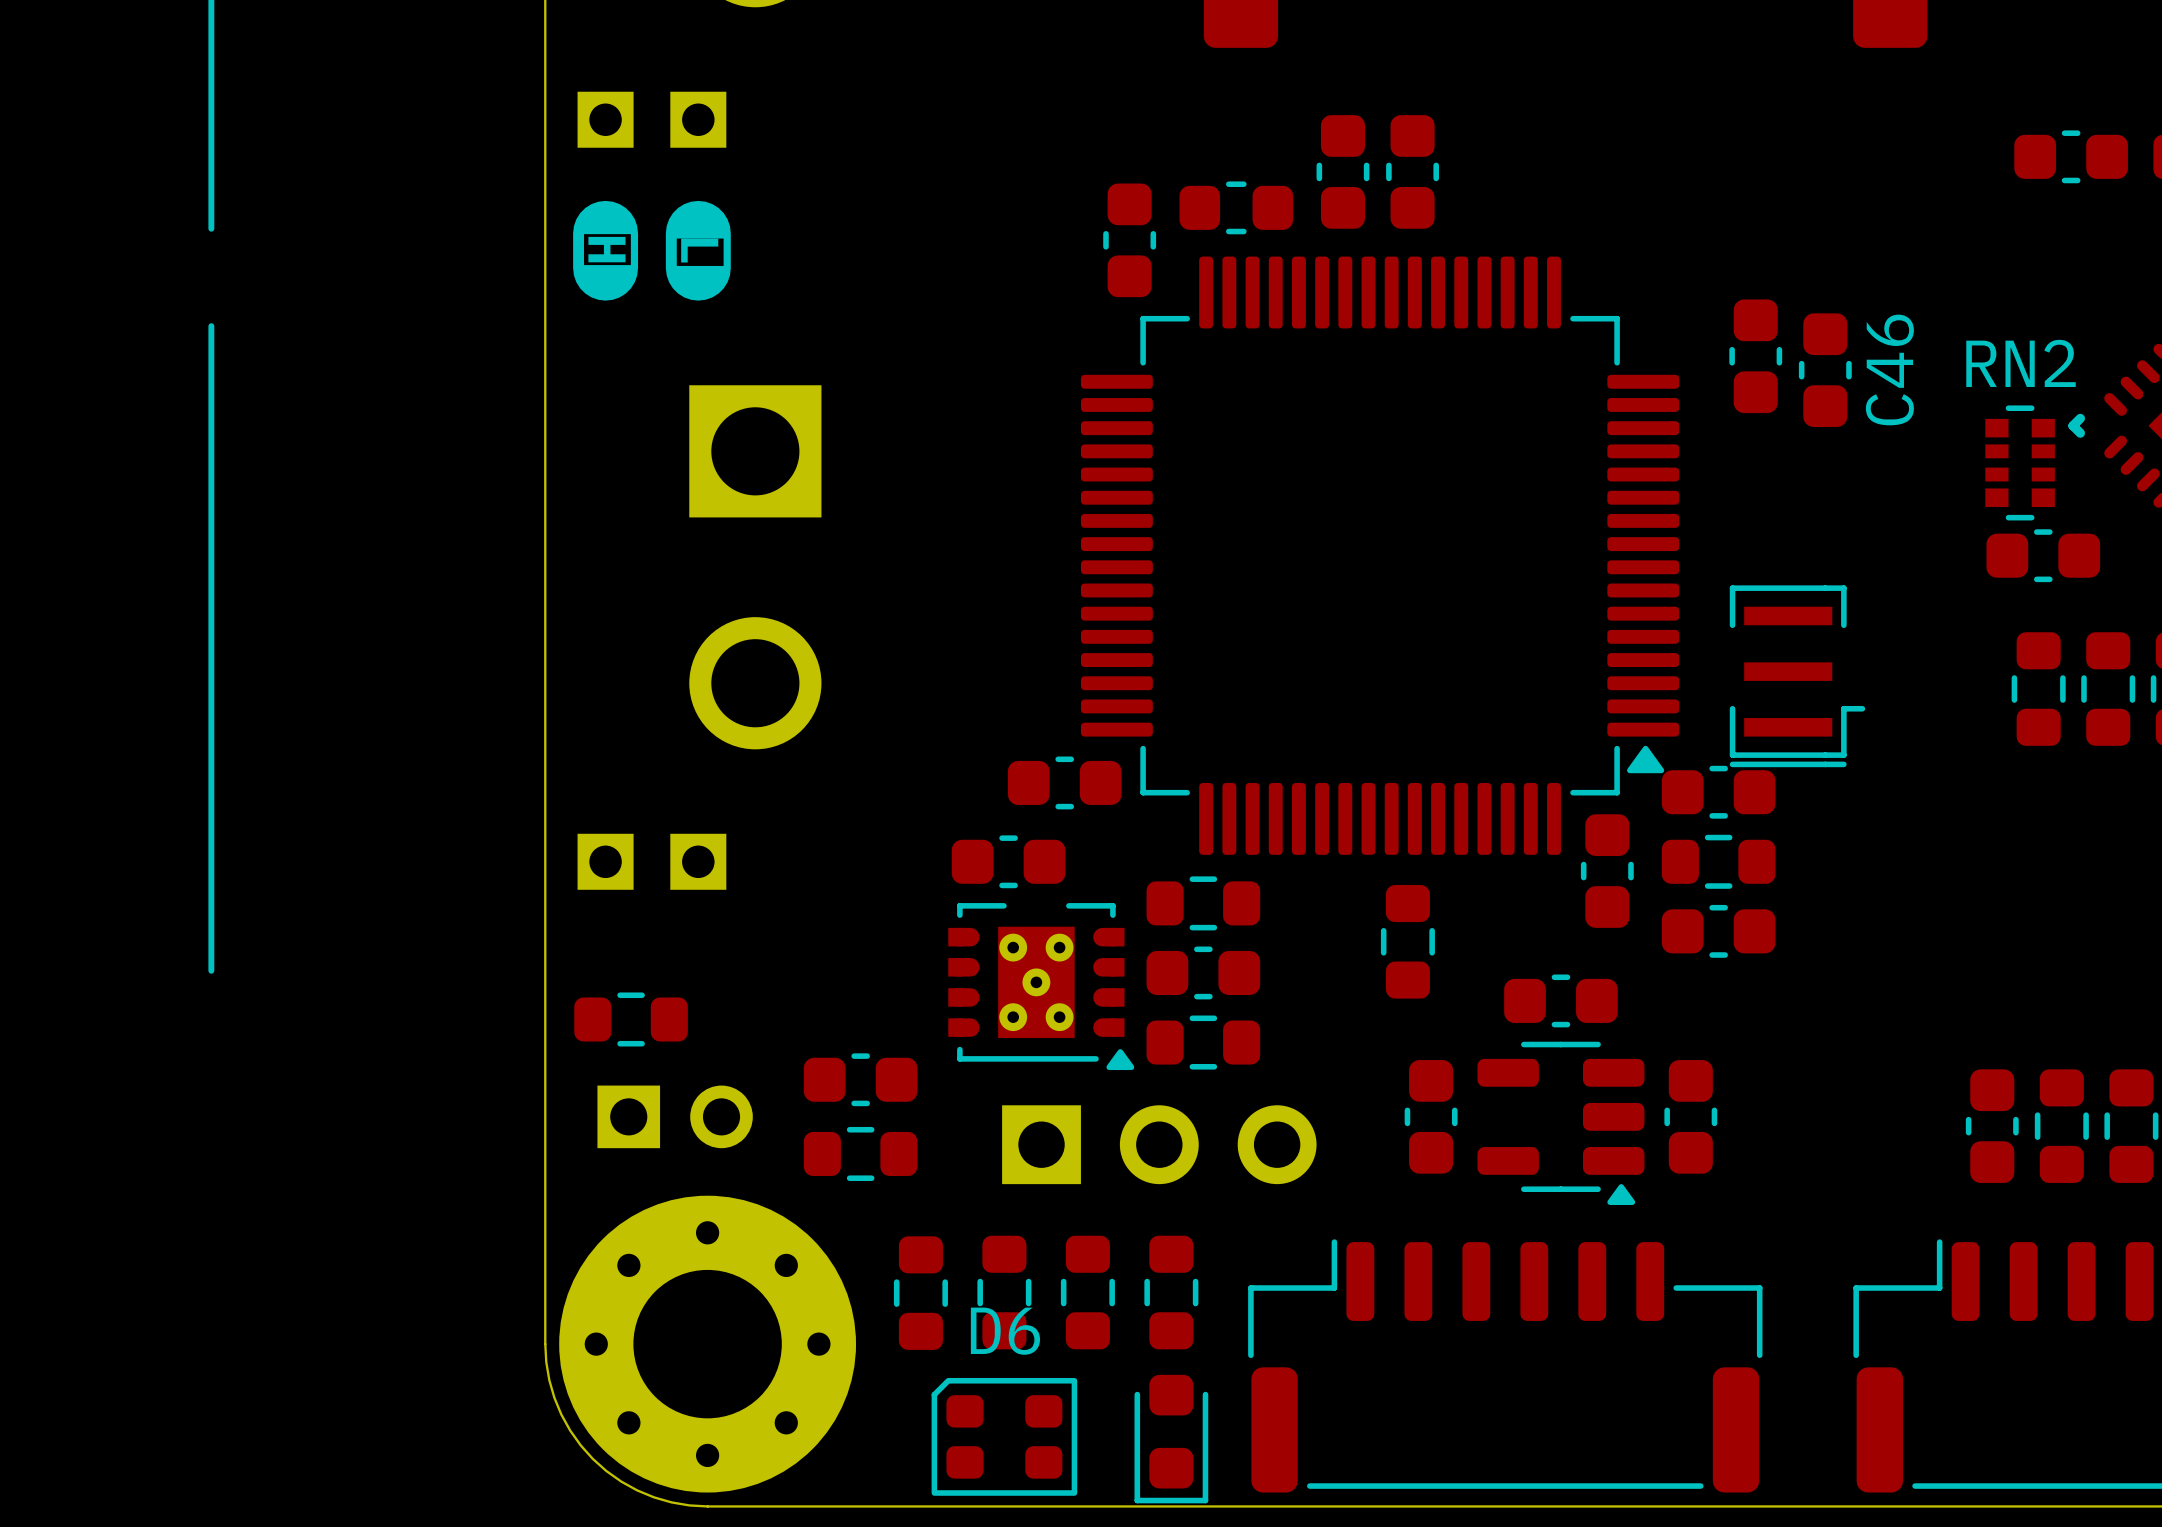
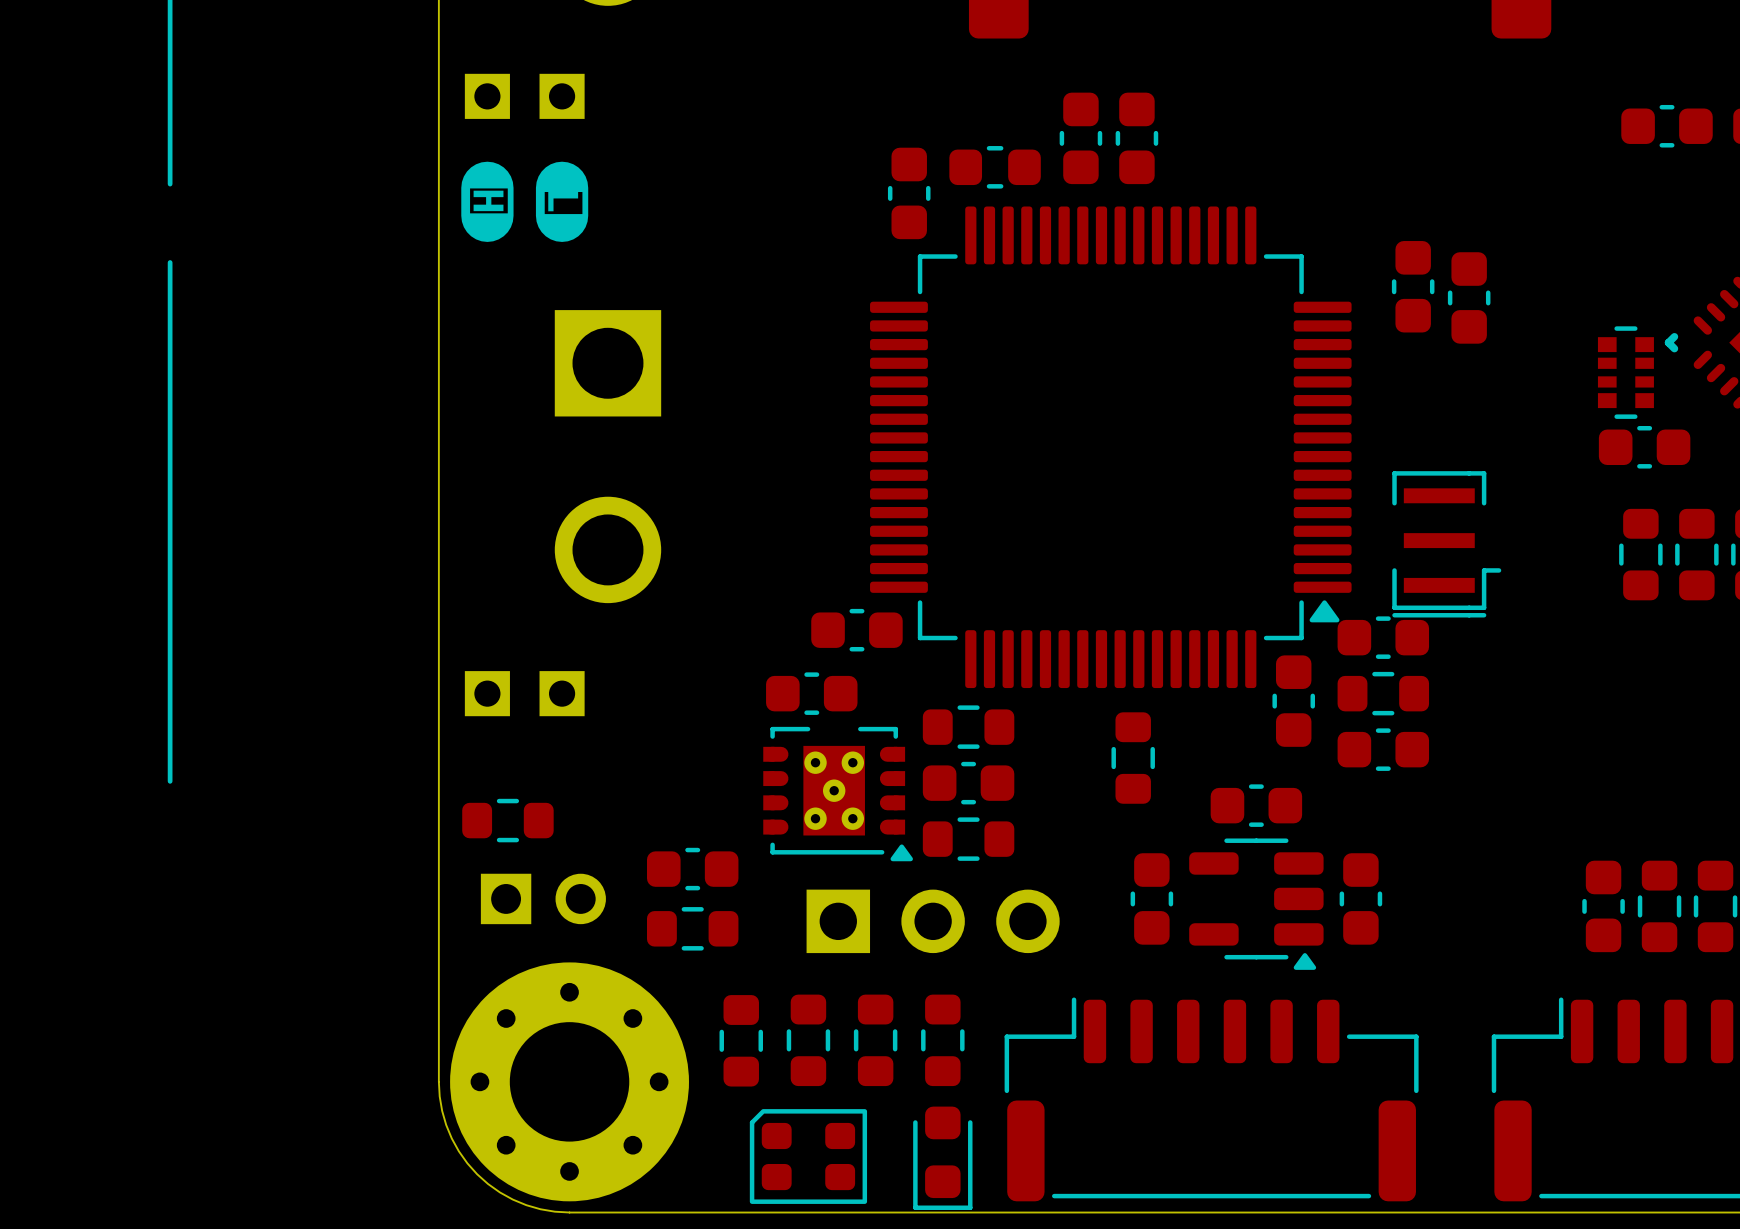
RN2 name: RN2 (2021, 363) -> none
C46 name: C46 (1889, 369) -> none
D6 name: D6 (1005, 1331) -> none

